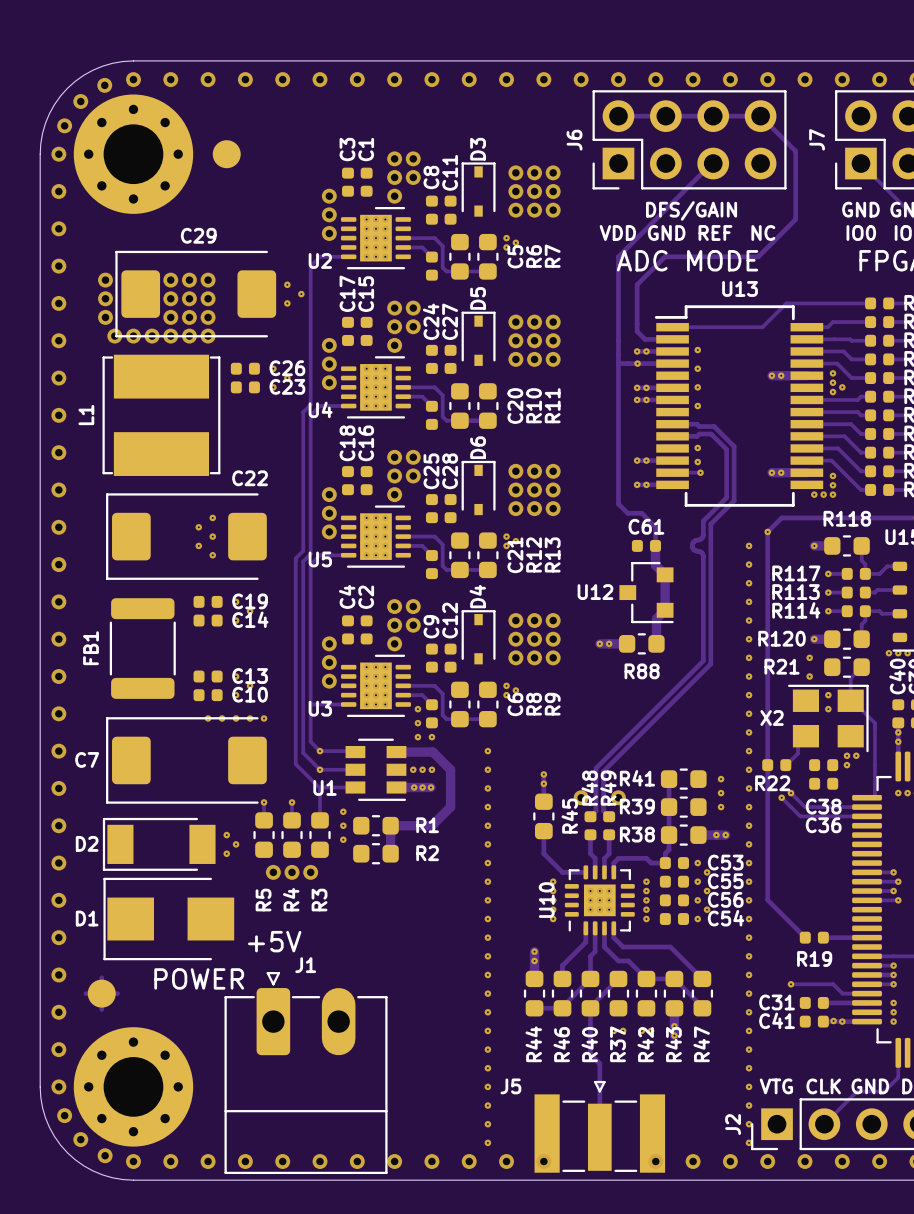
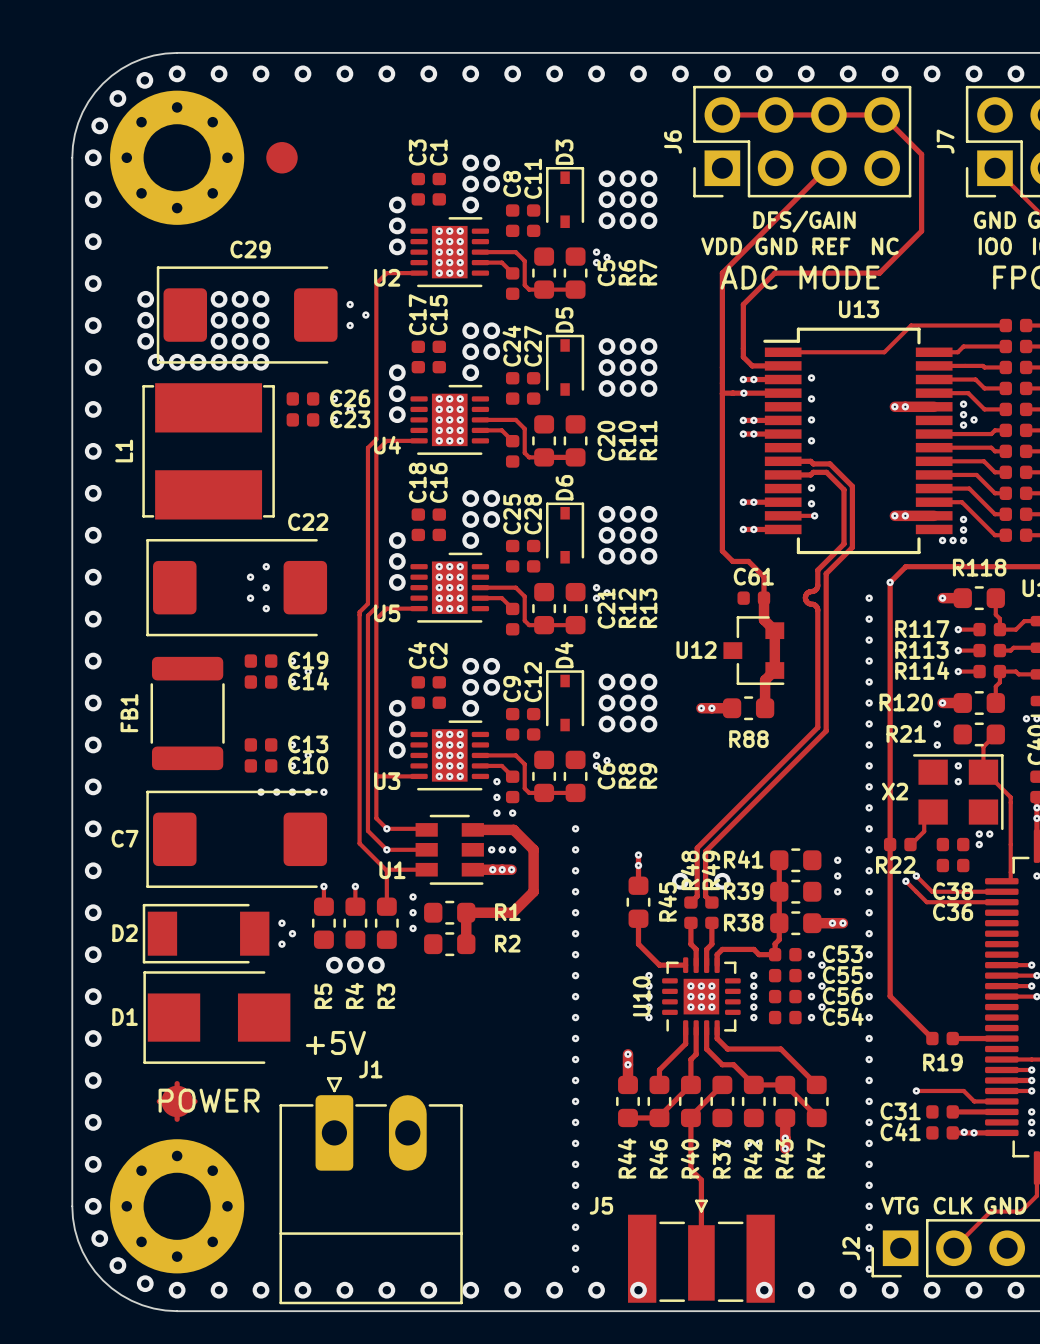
text position: POWER (199, 978) -> POWER (209, 1100)
part position: (101, 993) -> (177, 1101)

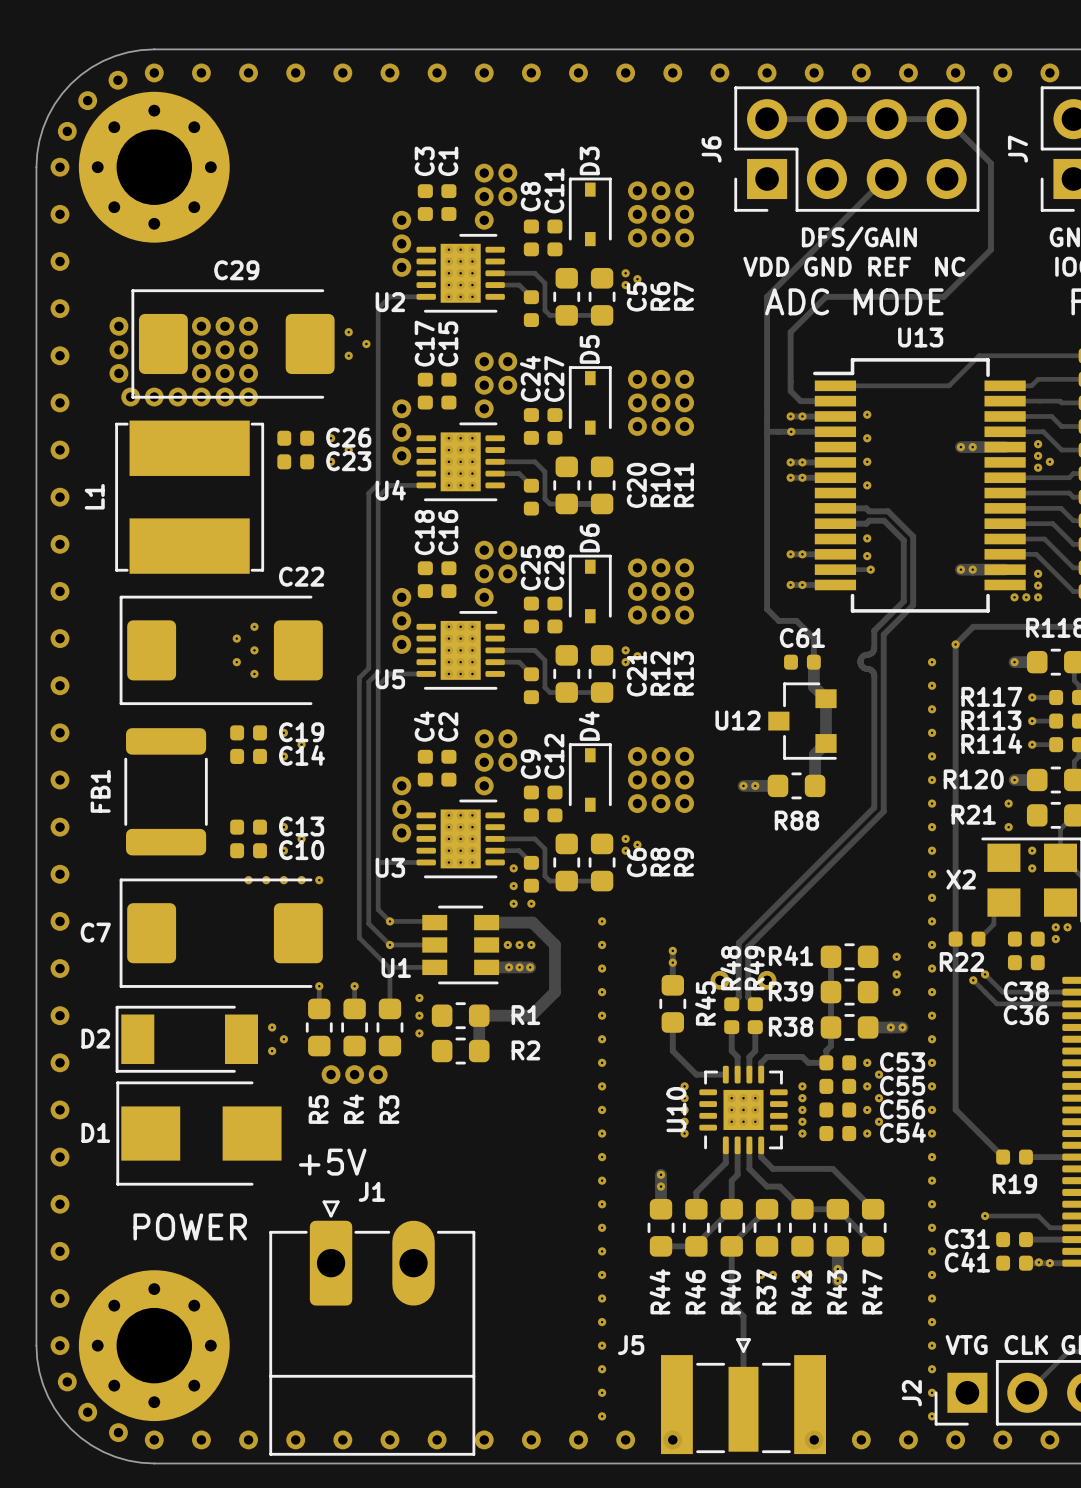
part: (281, 157) -> none
part: (177, 1101) -> none

